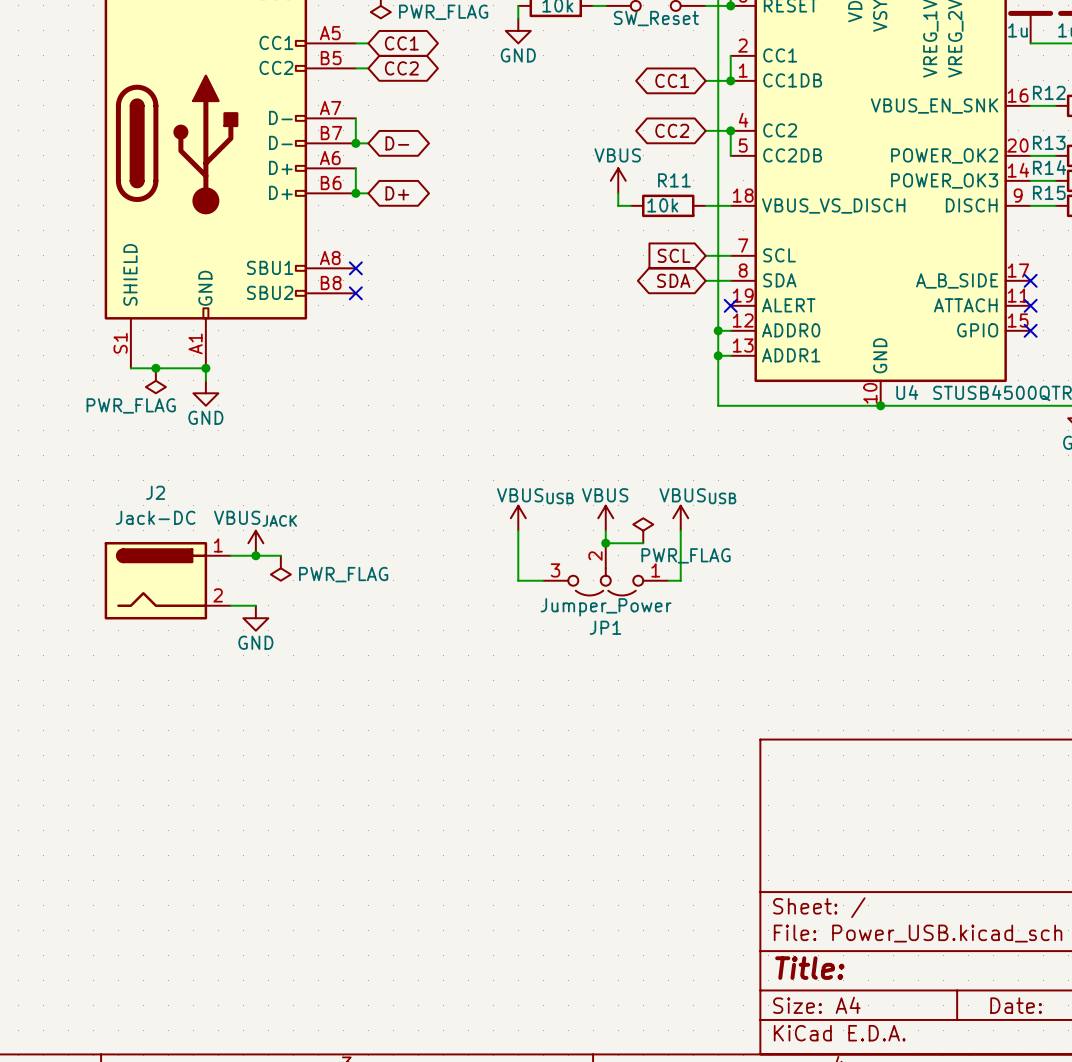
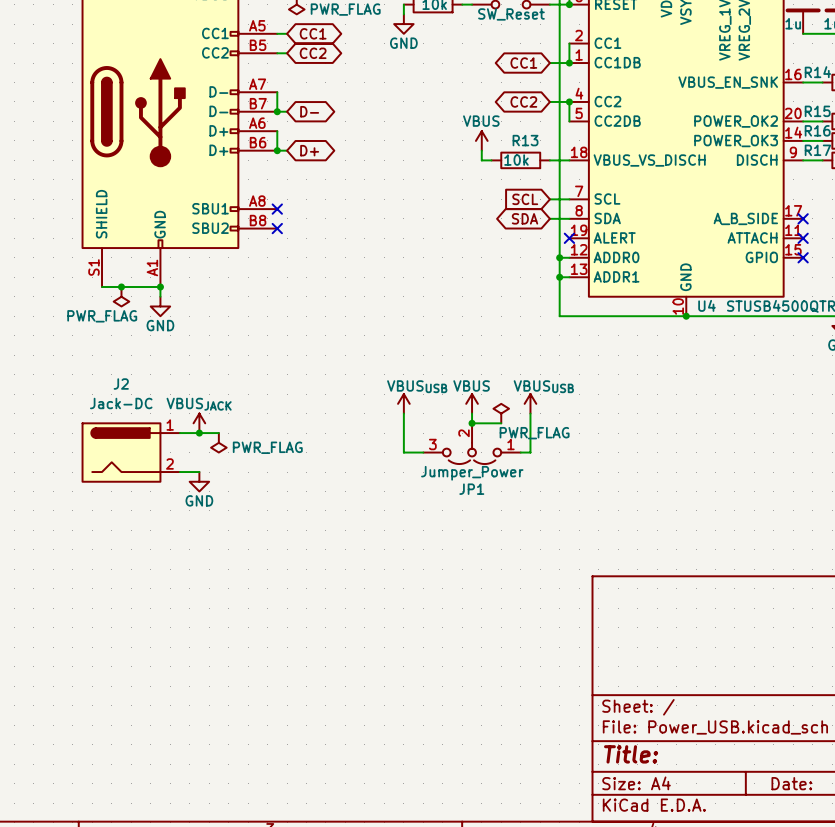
R12 name: R12 (1049, 92) -> R14 (817, 72)
R13 name: R13 (1049, 142) -> R15 (817, 111)
R14 name: R14 (1049, 167) -> R16 (817, 130)
R11 name: R11 (674, 180) -> R13 (525, 140)
R15 name: R15 (1049, 192) -> R17 (817, 150)

